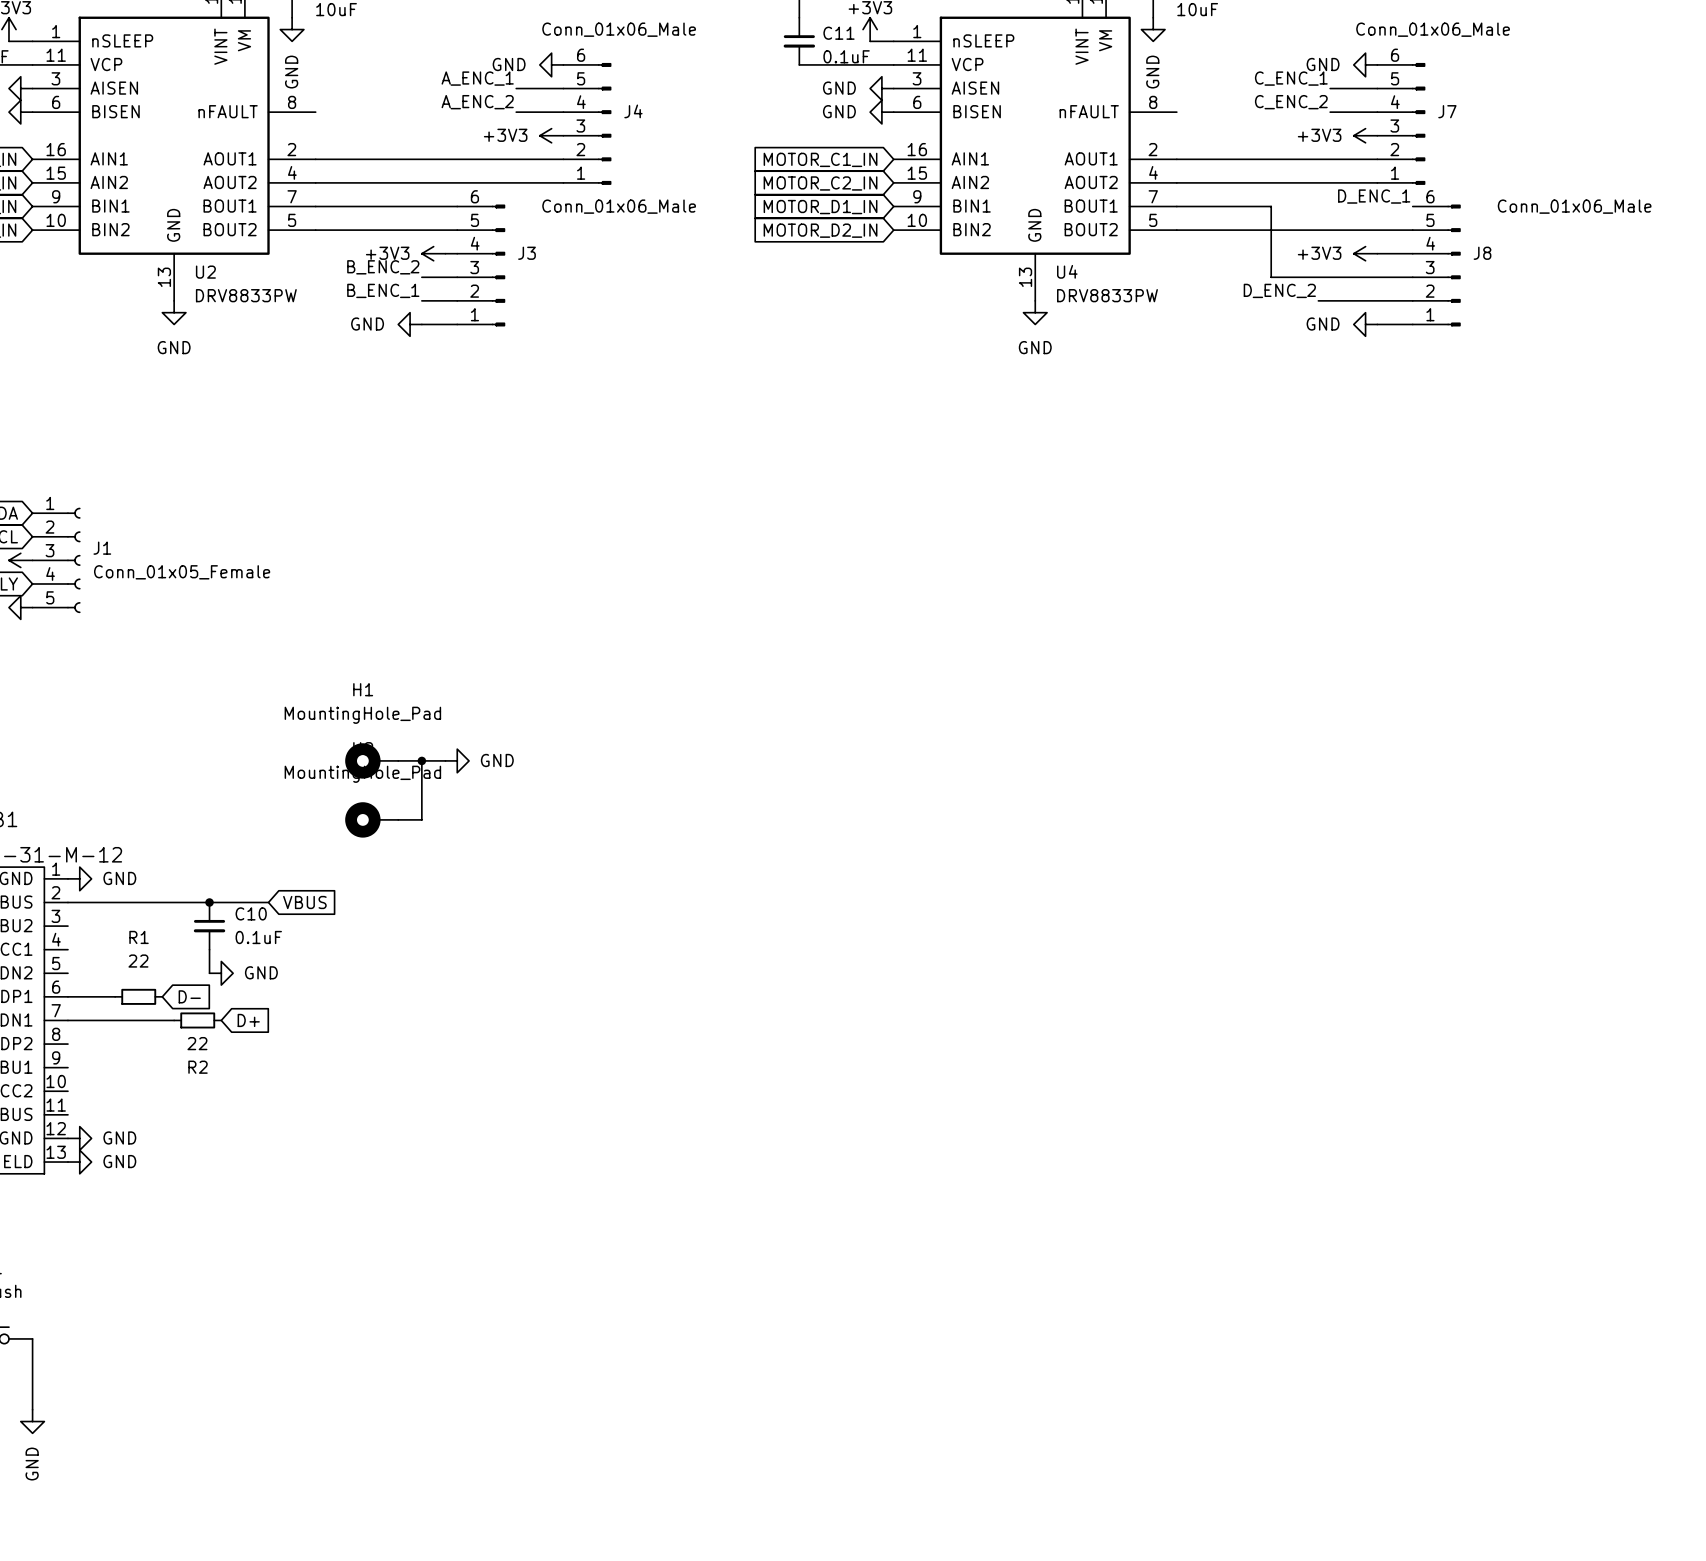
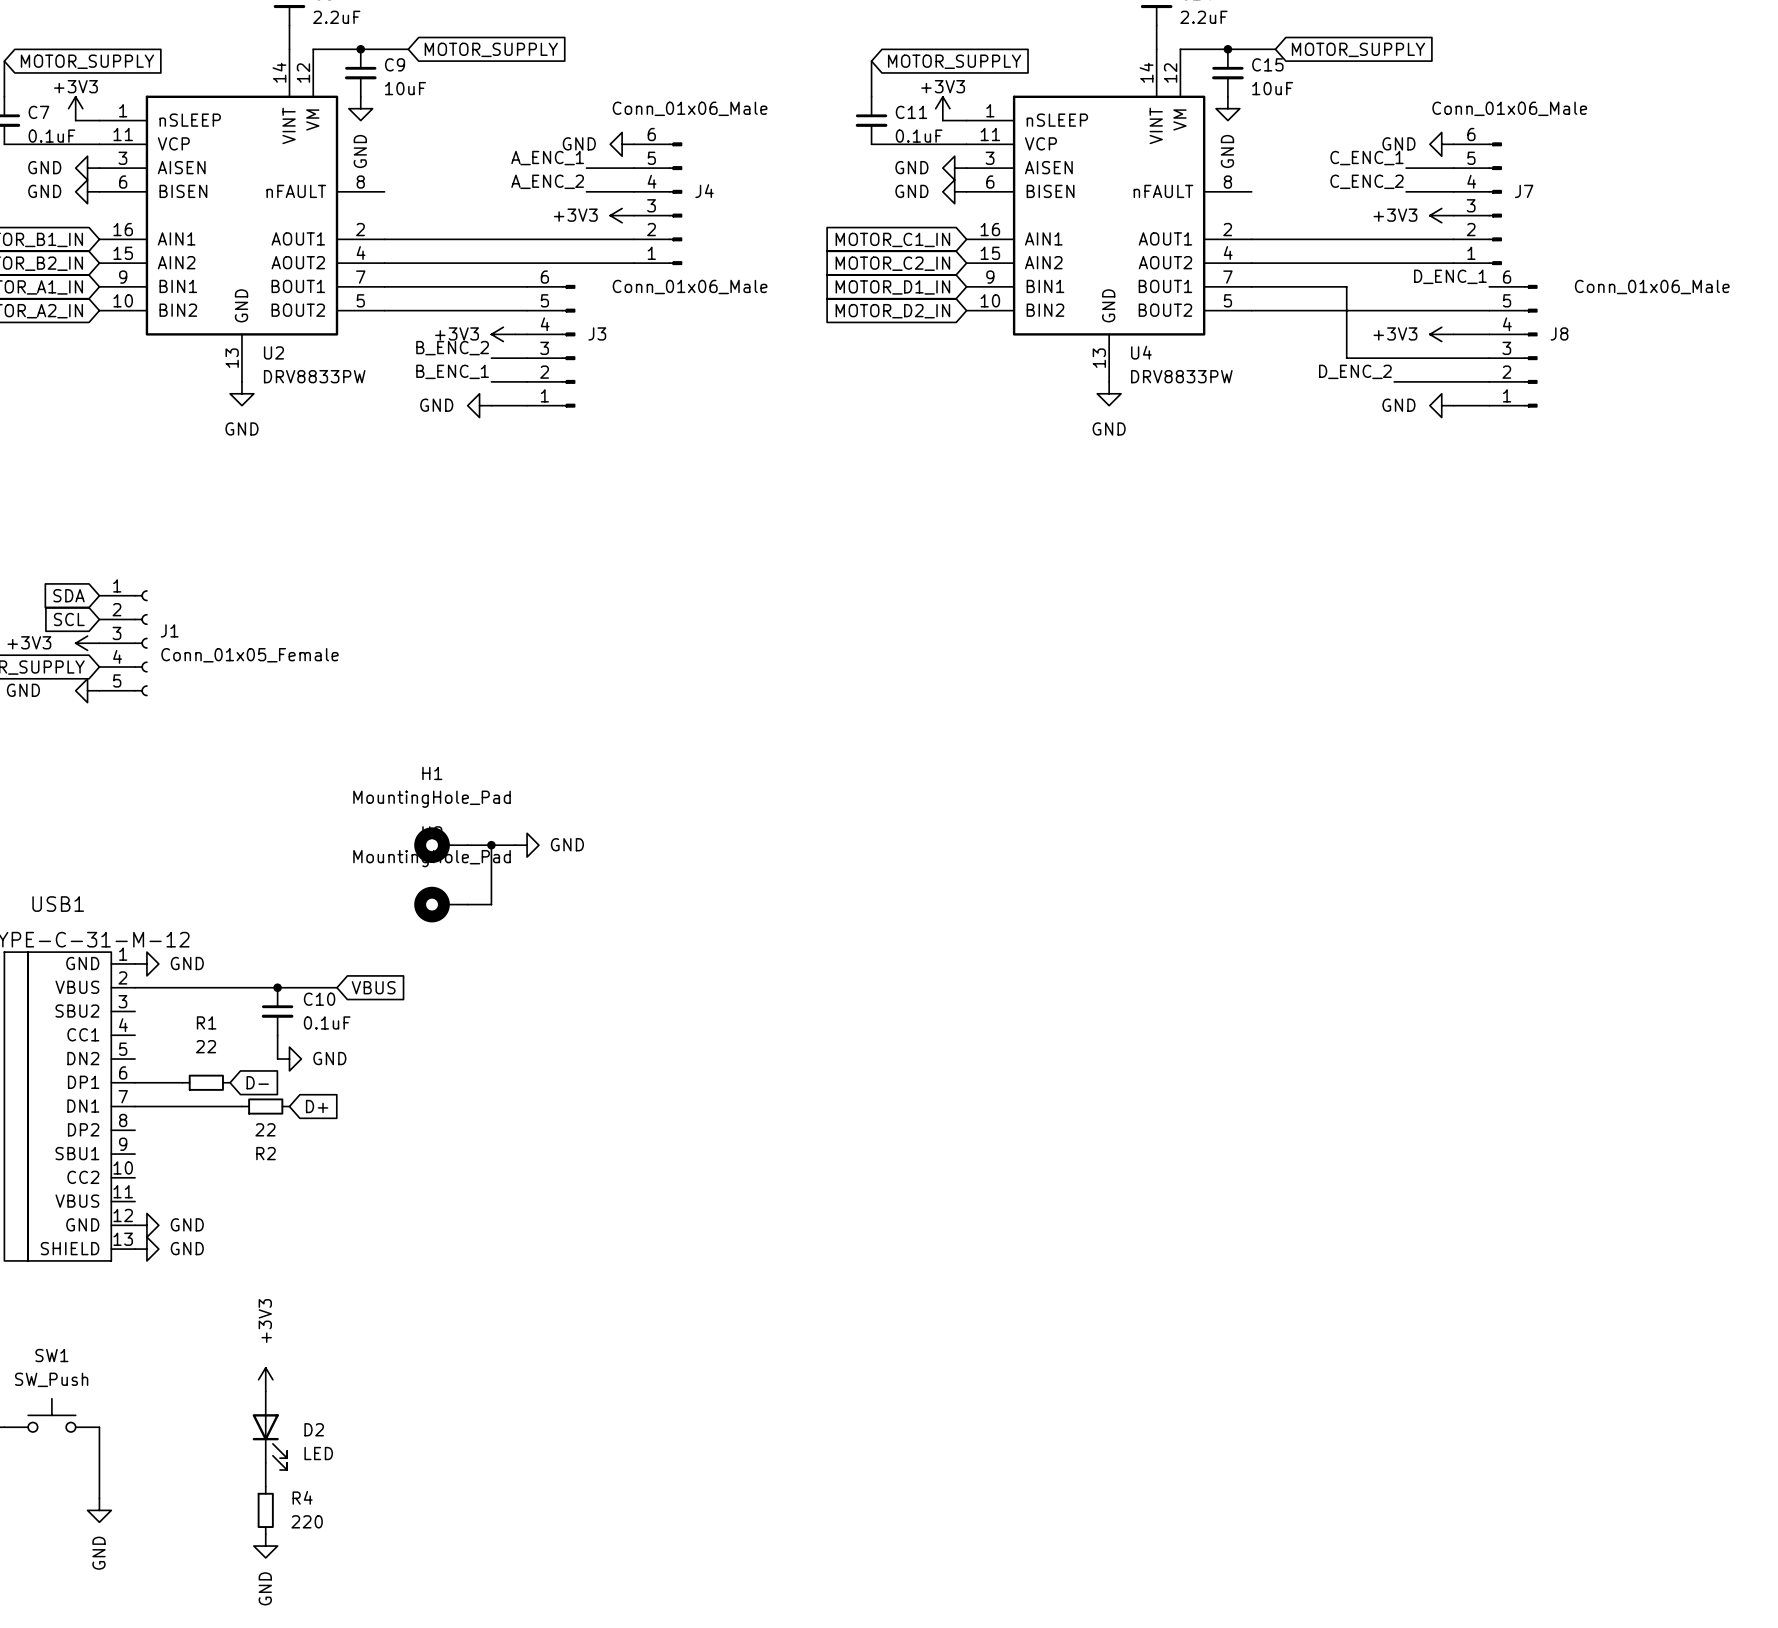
power symbol: none -> +3V3 (265, 1379)
D2: none -> LED (269, 1430)
wire: none -> (265, 1462) (265, 1486)
R4: none -> 220 (265, 1510)
power symbol: none -> GND (265, 1546)

